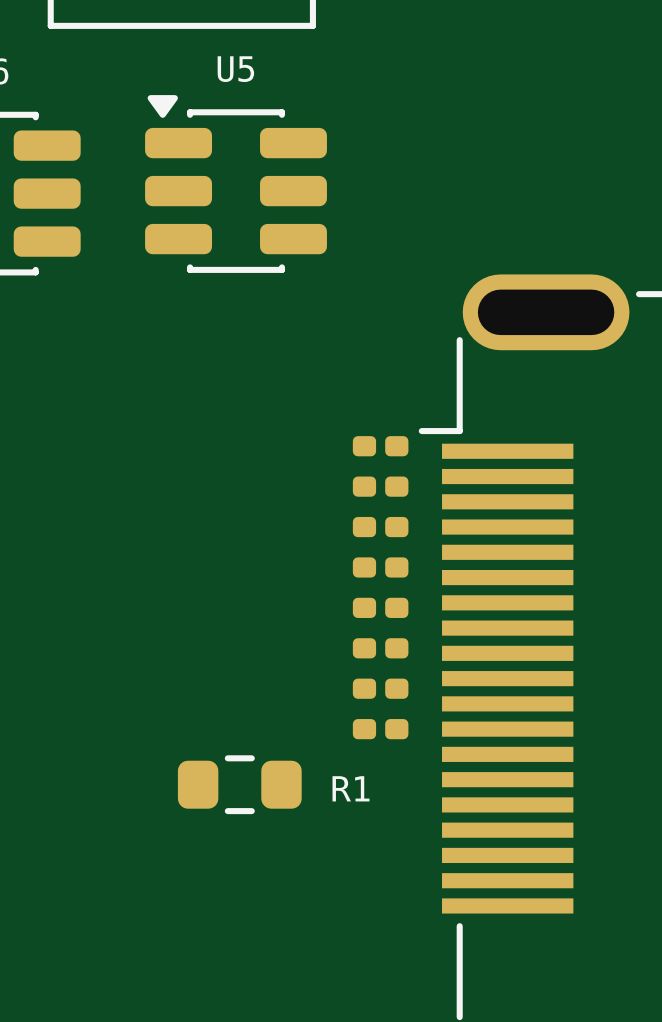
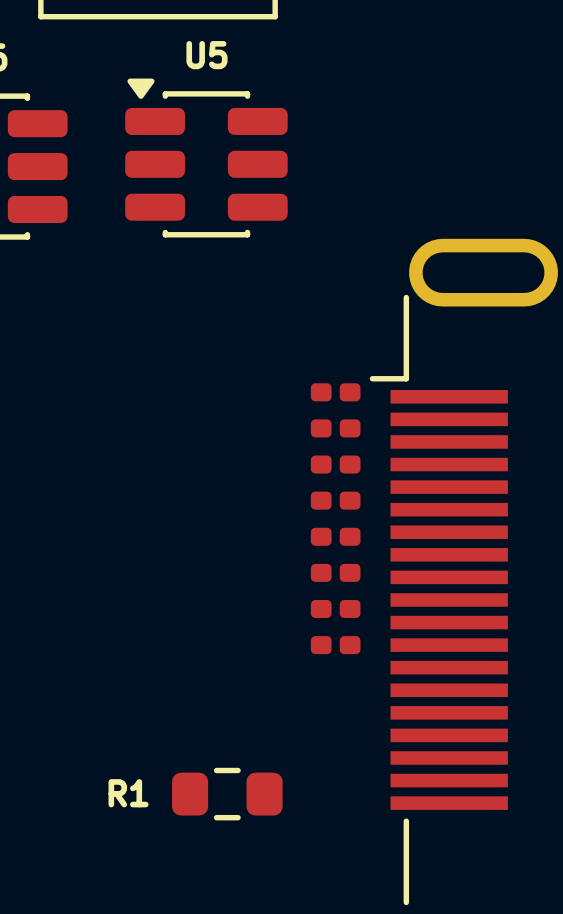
R1 position: (239, 784) -> (227, 794)
R1 name position: R1 (350, 788) -> R1 (128, 793)

